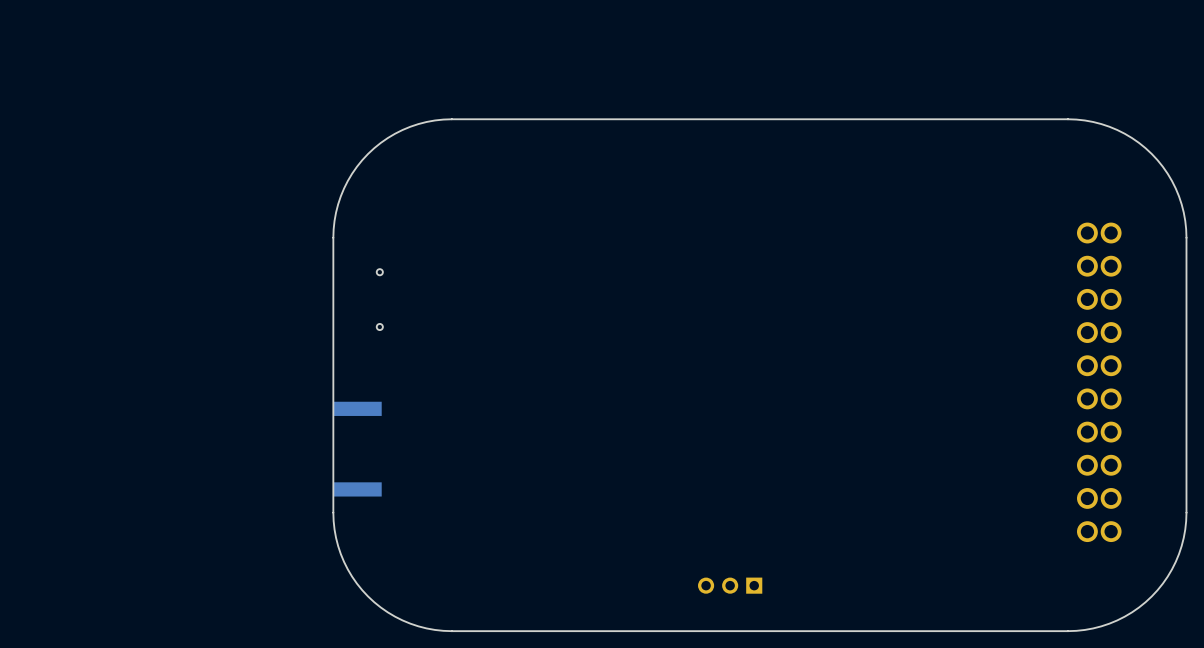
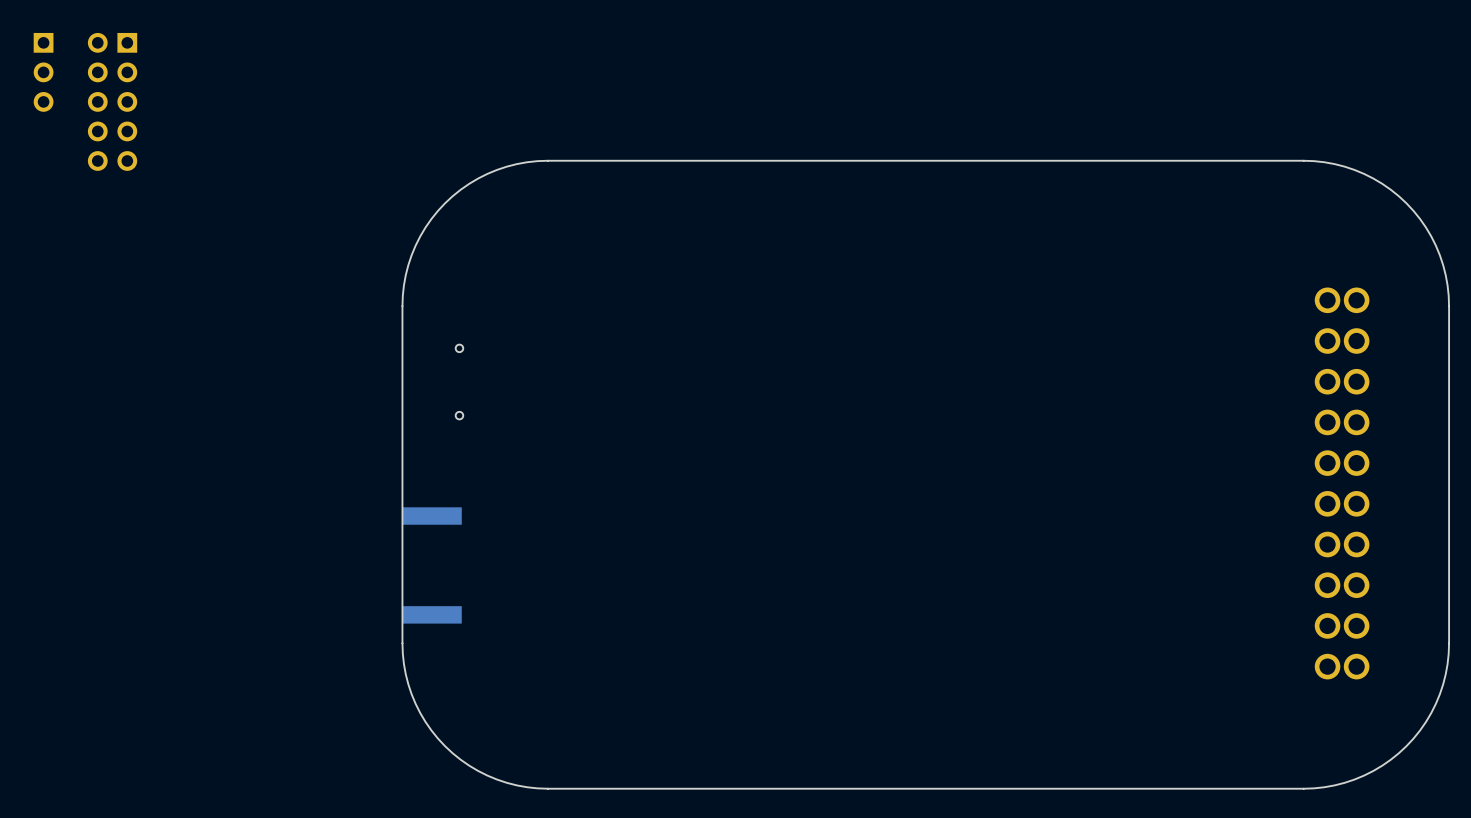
part: none -> (43, 72)
part: none -> (112, 101)
part: (730, 585) -> none

